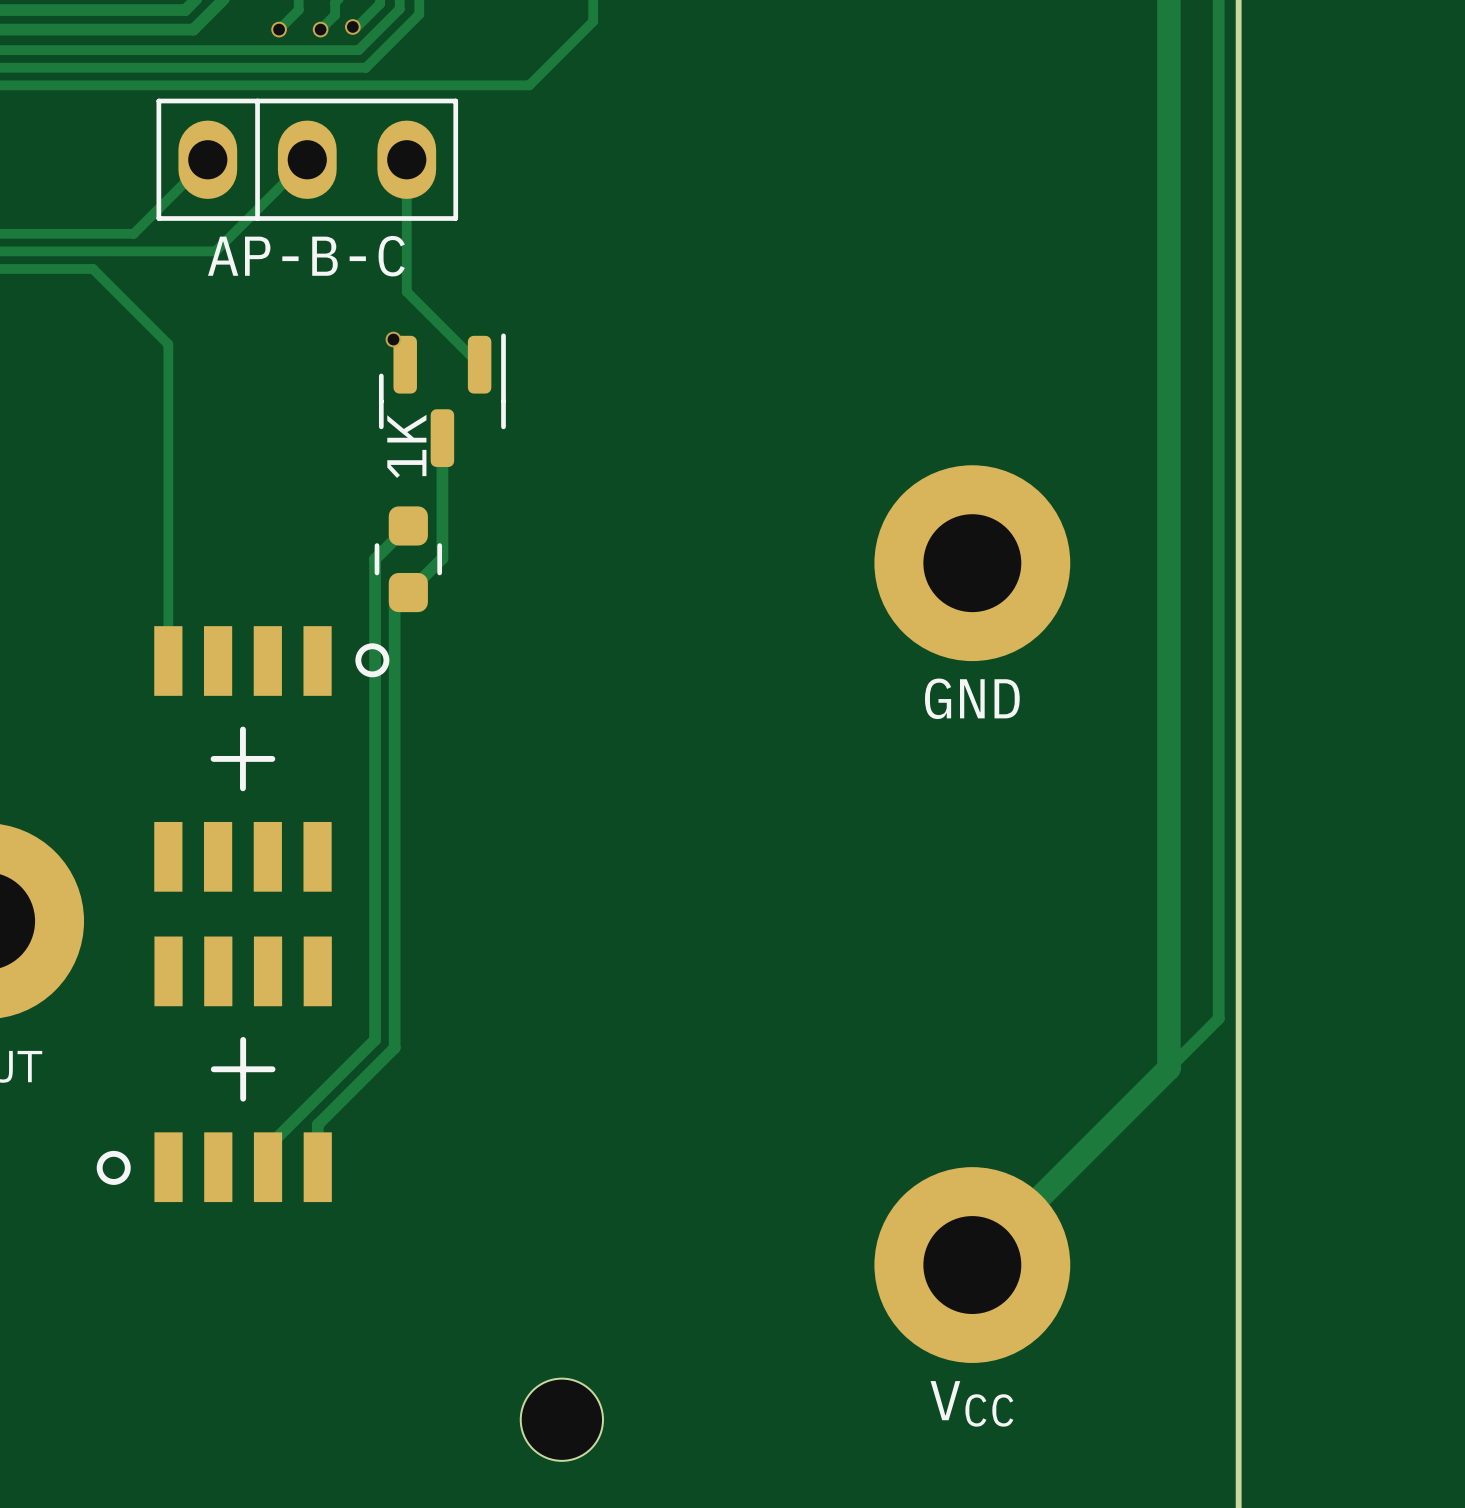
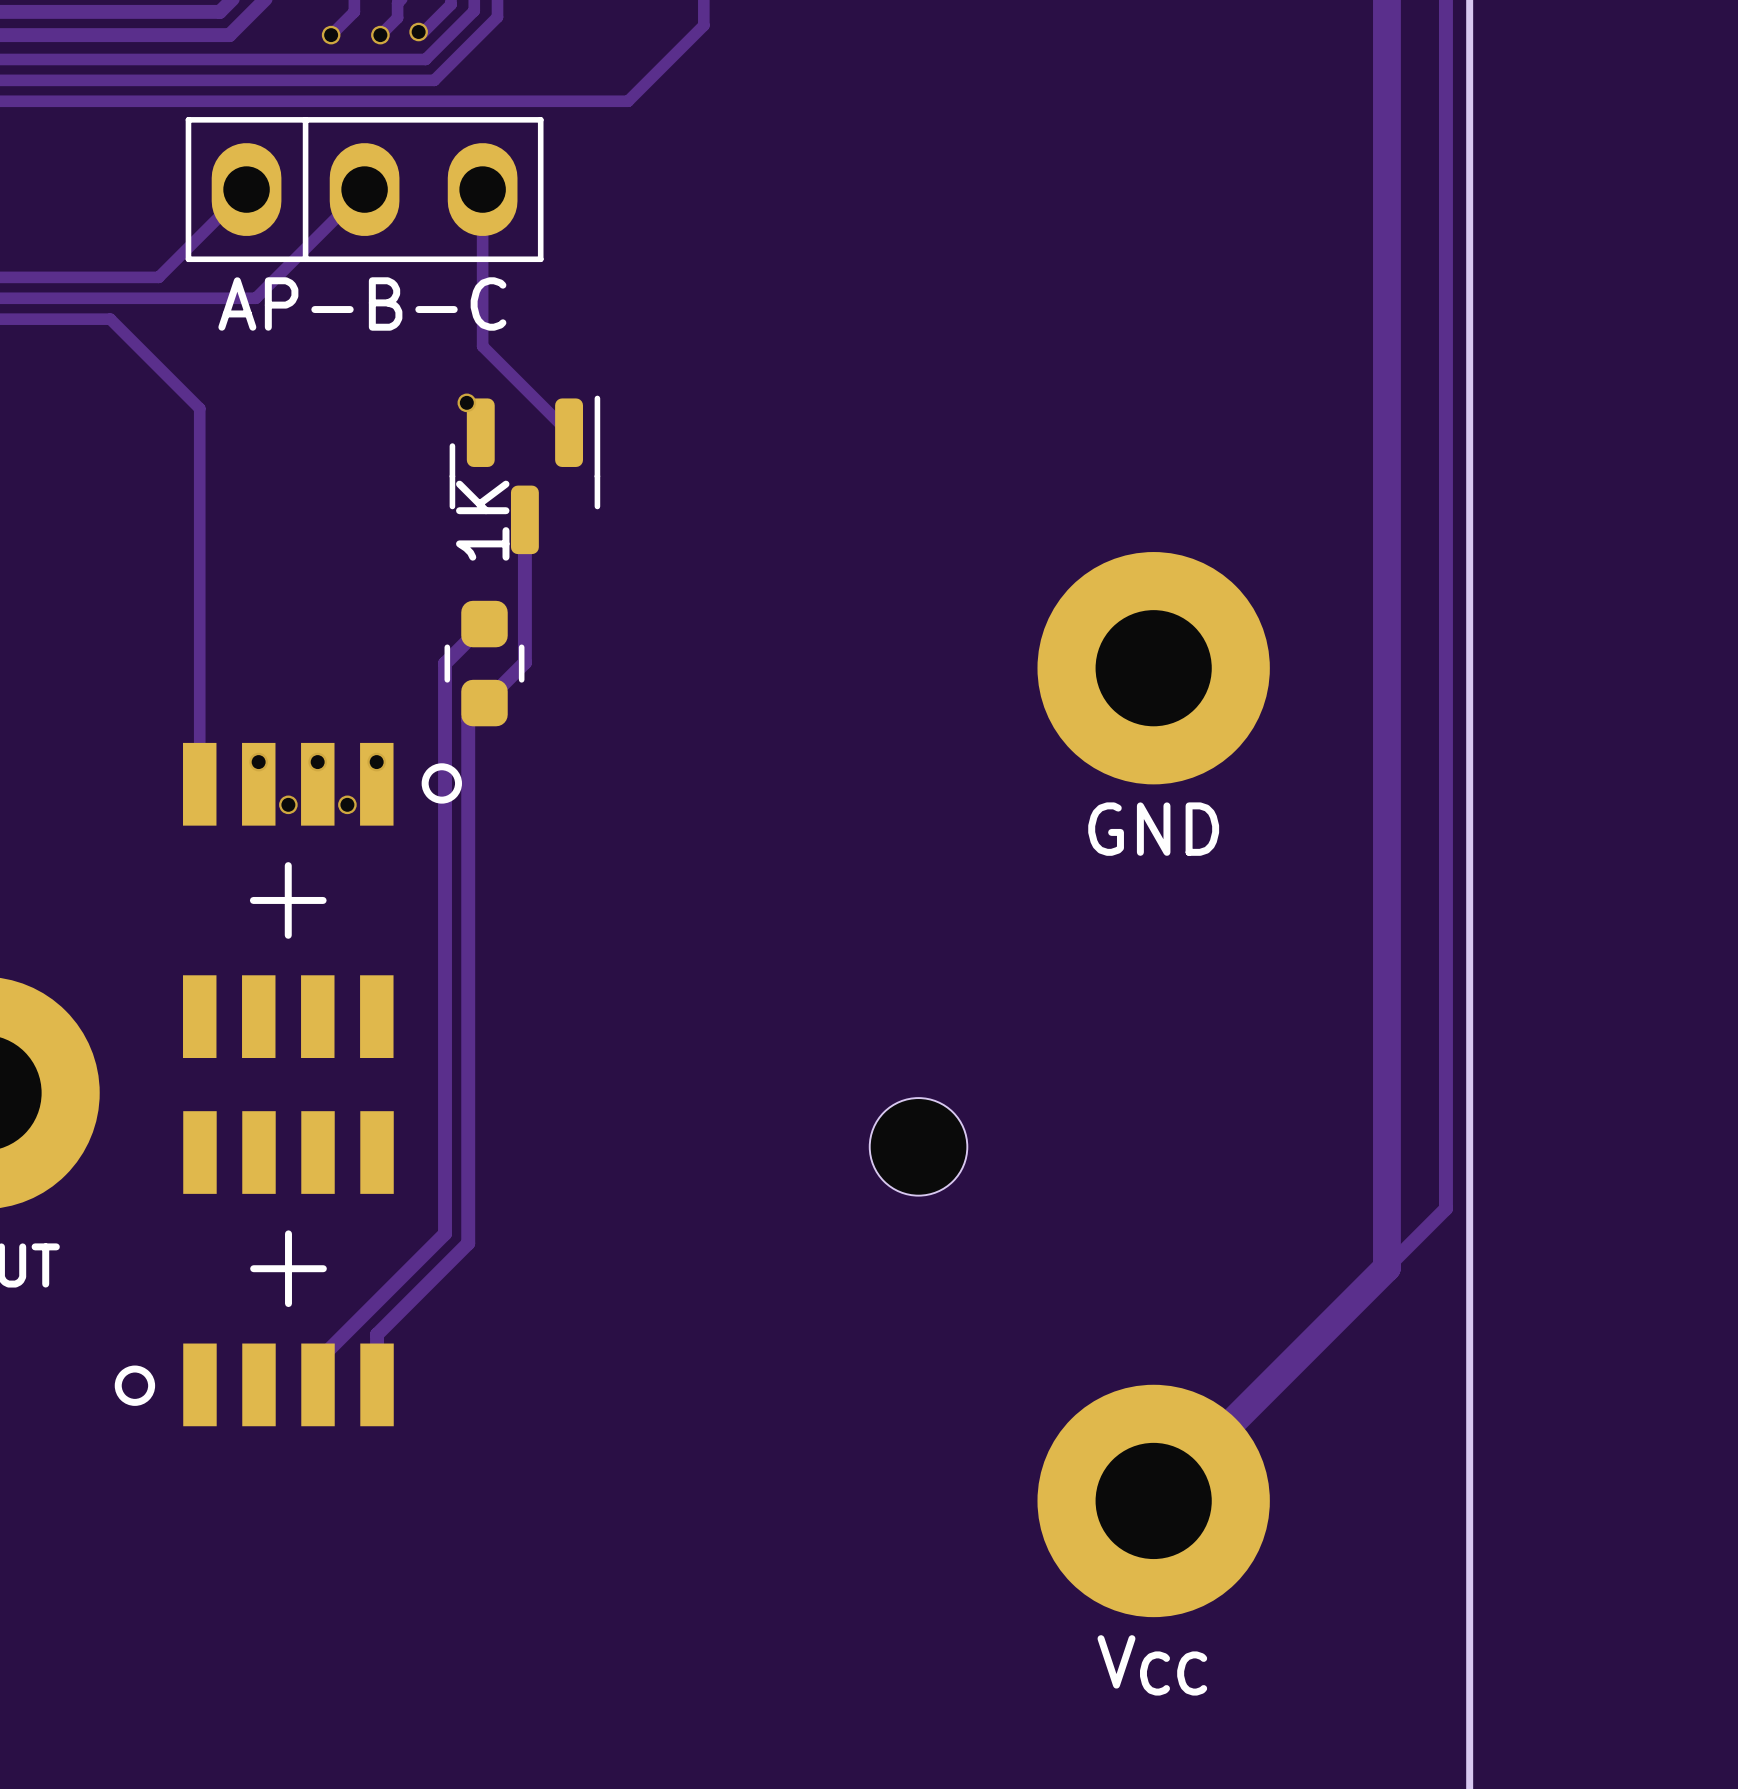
via: none -> (258, 762)
via: none -> (317, 762)
via: none -> (376, 762)
via: none -> (288, 804)
via: none -> (347, 804)
part position: (561, 1419) -> (918, 1146)

